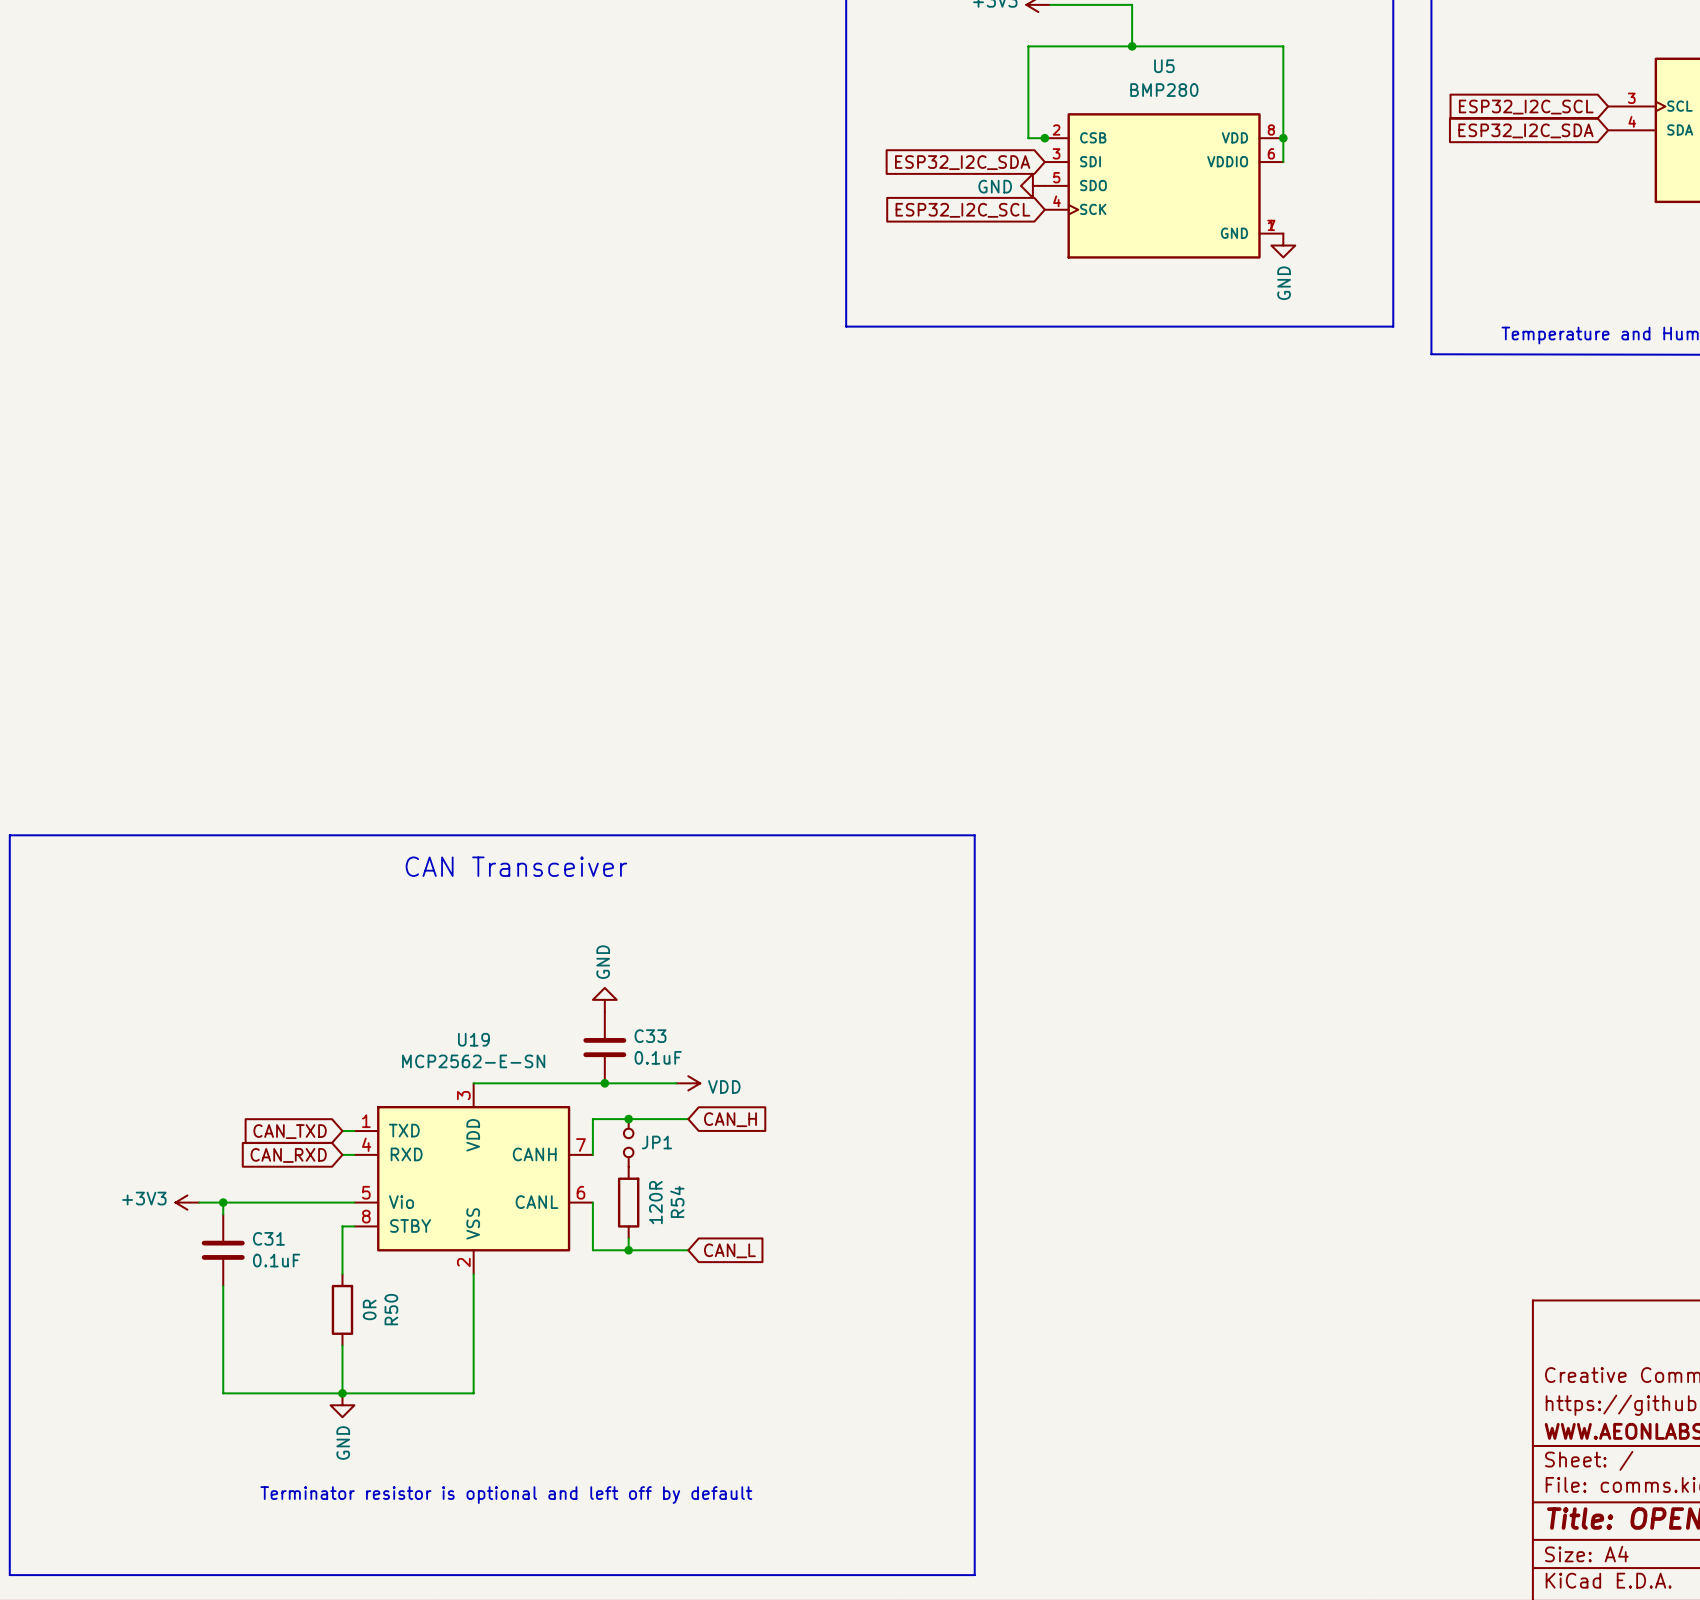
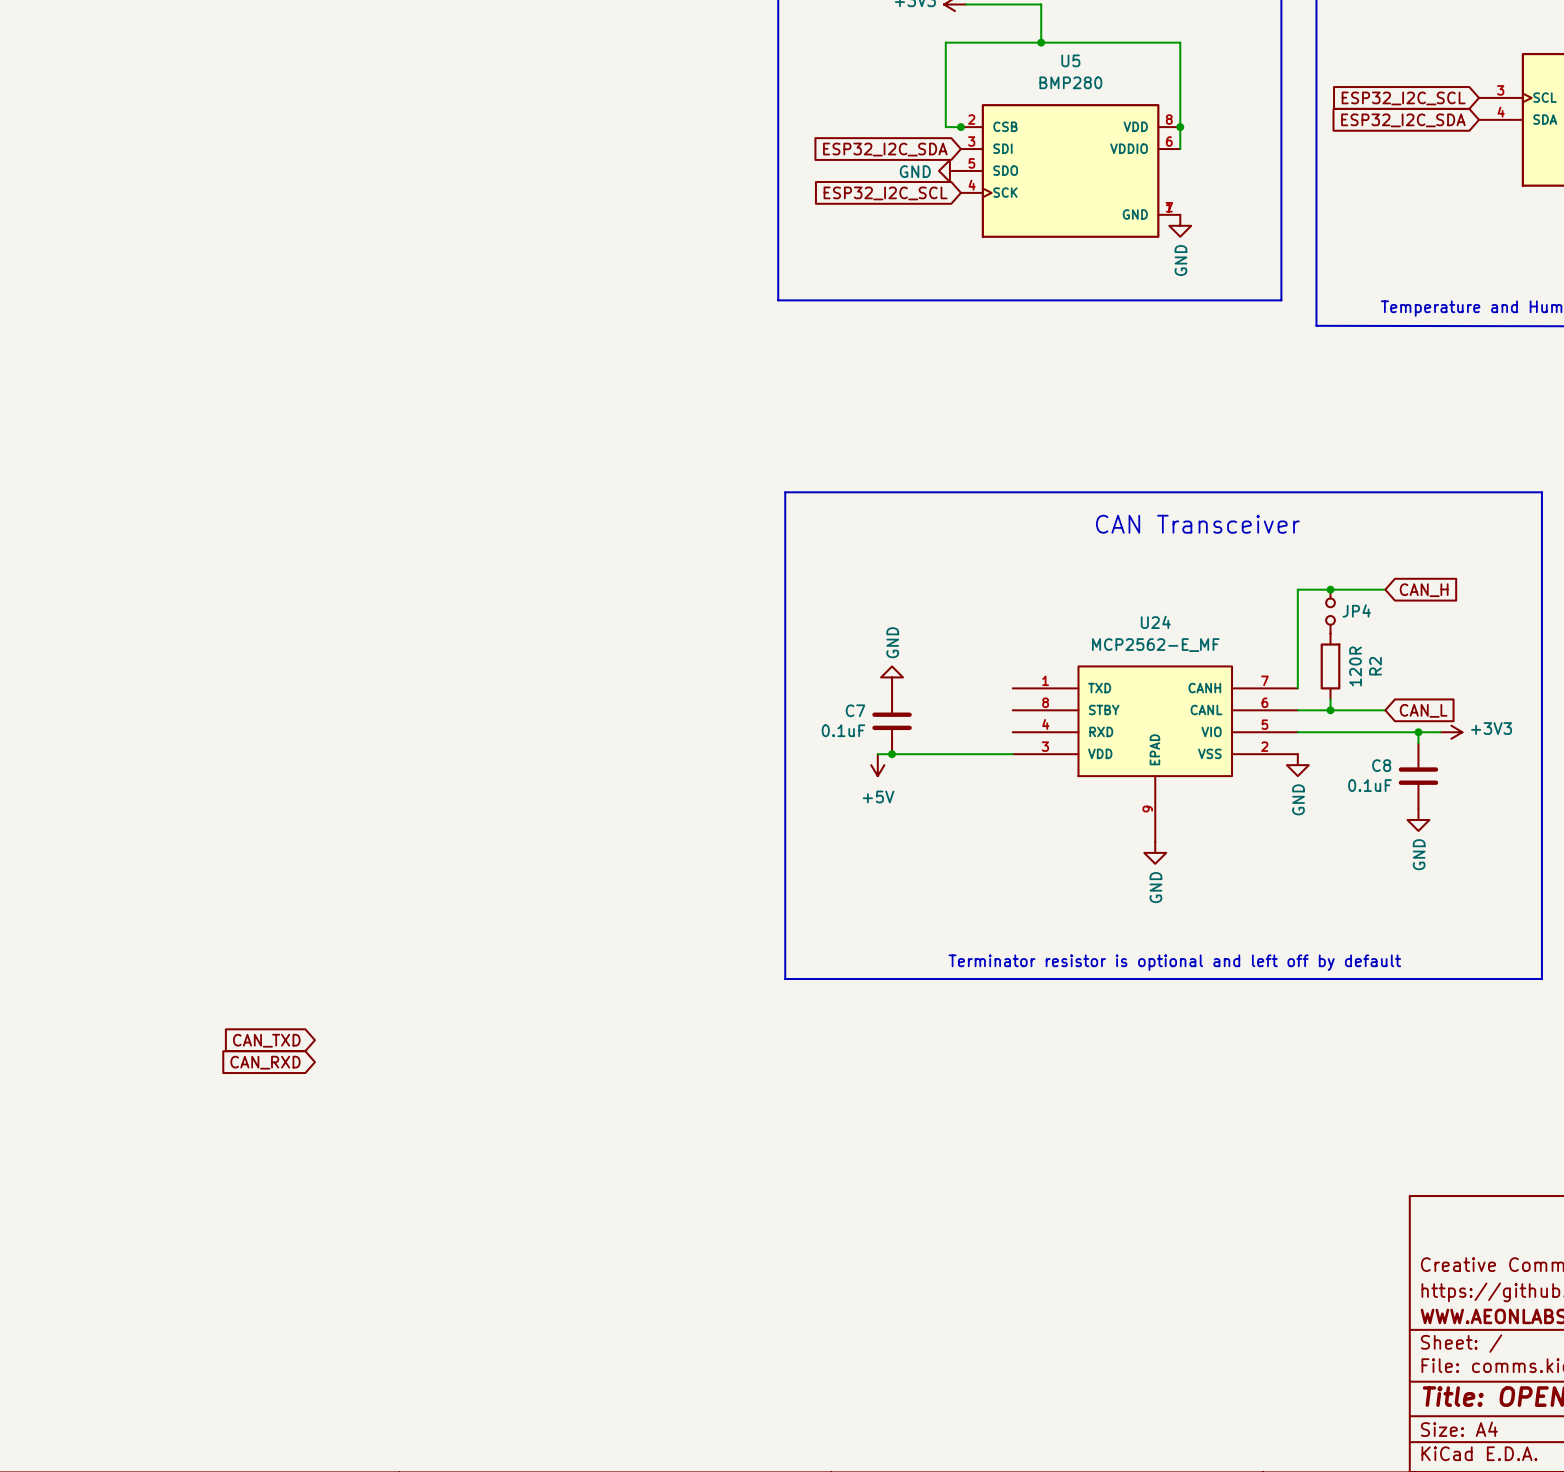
line: none -> (785, 492) (1541, 492) (1541, 979) (785, 979) (785, 492)
text: none -> CAN Transceiver (1197, 524)
junction: none -> (1330, 589)
wire: none -> (1385, 589) (1297, 589) (1297, 688)
global label: none -> CAN_H (1424, 590)
JP4: none -> (1330, 611)
R2: none -> 120R (1330, 666)
power symbol: none -> GND (892, 677)
wire: none -> (1330, 699) (1330, 710)
wire: none -> (1297, 710) (1385, 710)
junction: none -> (1330, 710)
global label: none -> CAN_L (1423, 710)
C7: none -> 0.1uF (892, 721)
wire: none -> (1297, 732) (1440, 732)
wire: none -> (1418, 732) (1418, 743)
junction: none -> (1418, 732)
power symbol: none -> +3V3 (1451, 732)
U24: none -> MCP2562-E_MF (1155, 753)
wire: none -> (877, 754) (1012, 754)
junction: none -> (892, 754)
power symbol: none -> +5V (877, 765)
power symbol: none -> GND (1297, 765)
line: (9, 835) (974, 835) (974, 1575) (9, 1575) (9, 835) -> none
C8: none -> 0.1uF (1418, 776)
text: CAN Transceiver (516, 866) -> none
power symbol: none -> GND (1418, 819)
power symbol: none -> GND (1155, 852)
power symbol: GND (604, 999) -> none
text: none -> Terminator resistor is optional and left off by default (1174, 962)
C33: 0.1uF (604, 1047) -> none
wire: (473, 1083) (676, 1083) -> none
junction: (604, 1083) -> none
power symbol: VDD (688, 1083) -> none
junction: (628, 1119) -> none
wire: (688, 1119) (592, 1119) (592, 1154) -> none
global label: CAN_H (730, 1119) -> none
wire: (342, 1131) (354, 1131) -> none
JP1: (628, 1142) -> none
wire: (342, 1154) (354, 1154) -> none
U19: MCP2562-E-SN (473, 1178) -> none
power symbol: +3V3 (187, 1202) -> none
wire: (199, 1202) (354, 1202) -> none
wire: (223, 1202) (223, 1214) -> none
junction: (223, 1202) -> none
wire: (592, 1202) (592, 1250) (688, 1250) -> none
R54: 120R (628, 1202) -> none
wire: (354, 1226) (342, 1226) (342, 1274) -> none
wire: (628, 1238) (628, 1250) -> none
C31: 0.1uF (223, 1250) -> none
junction: (628, 1250) -> none
global label: CAN_L (729, 1250) -> none
wire: (473, 1274) (473, 1393) (223, 1393) (223, 1286) -> none
R50: 0R (342, 1309) -> none
wire: (342, 1345) (342, 1393) -> none
junction: (342, 1393) -> none
power symbol: GND (342, 1405) -> none
text: Terminator resistor is optional and left off by default (506, 1495) -> none

